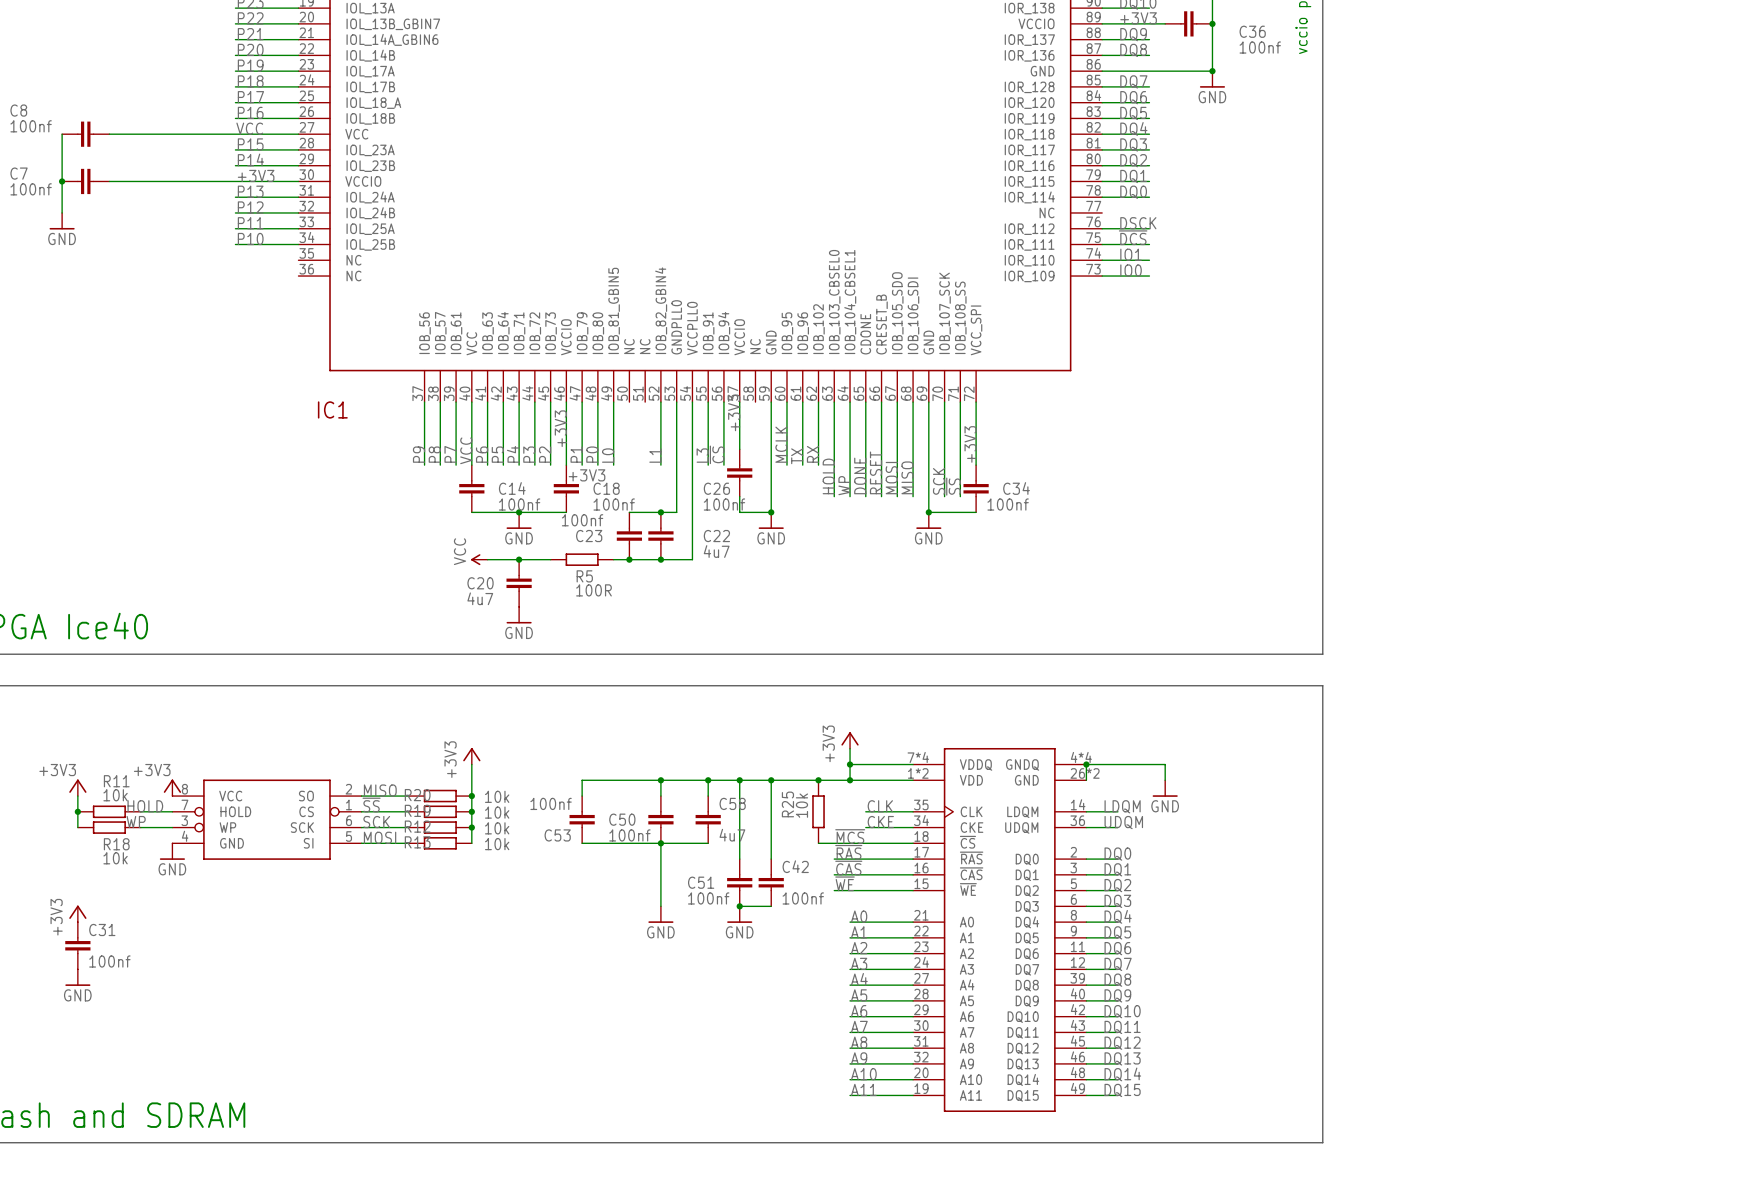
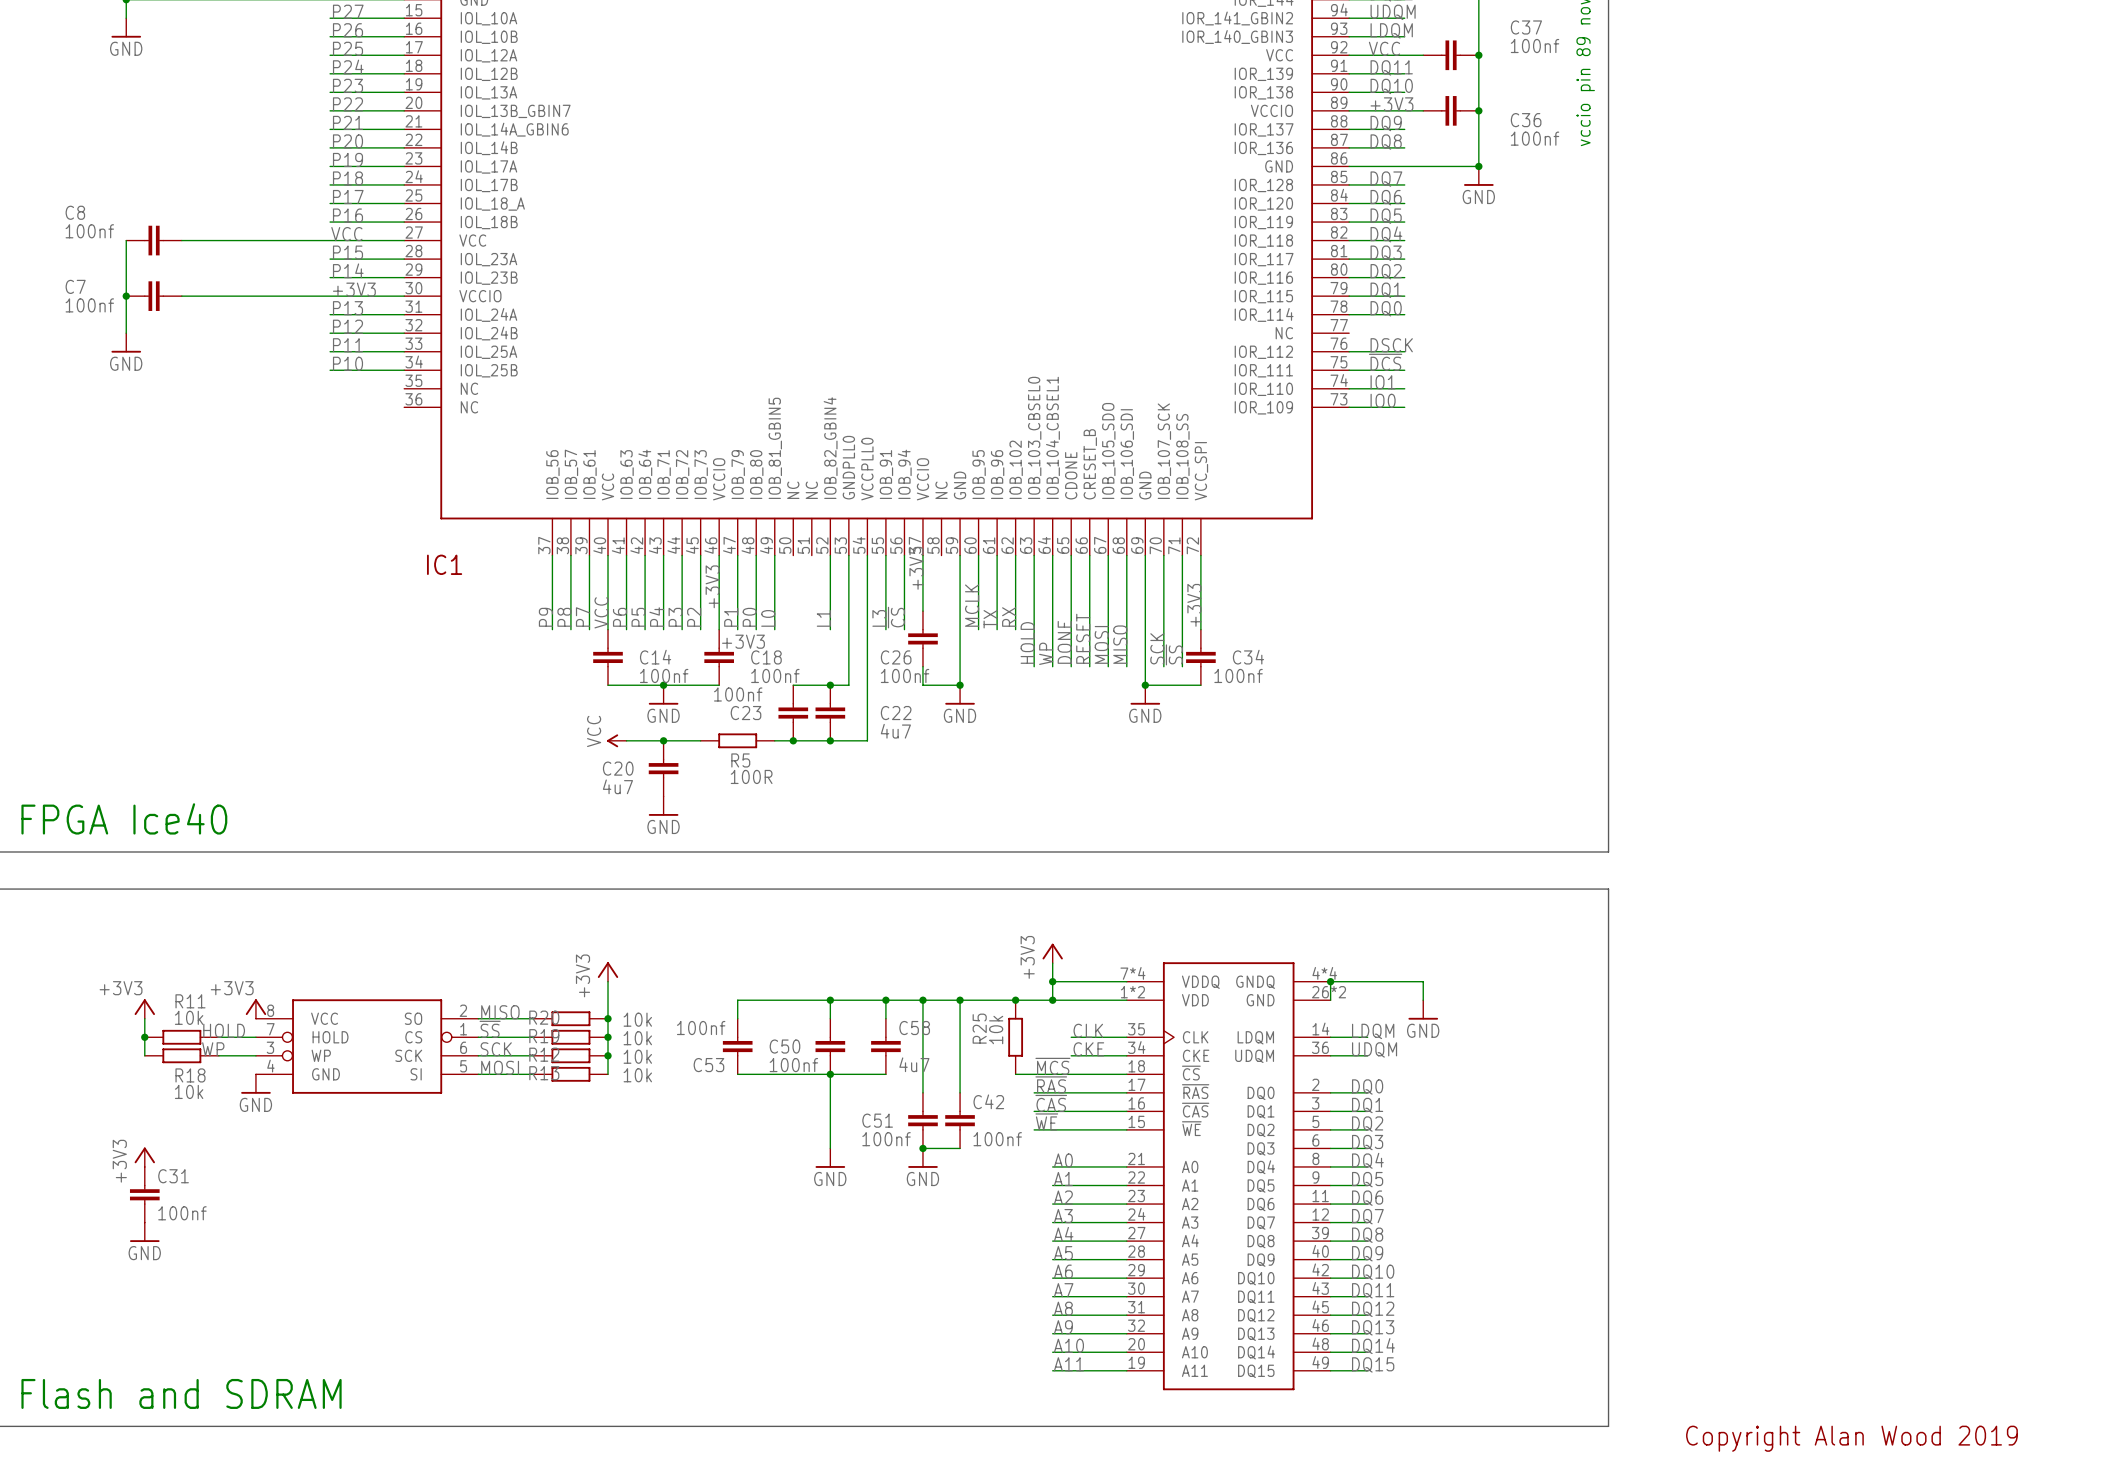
text: none -> Copyright Alan Wood 2019 (1851, 1438)

